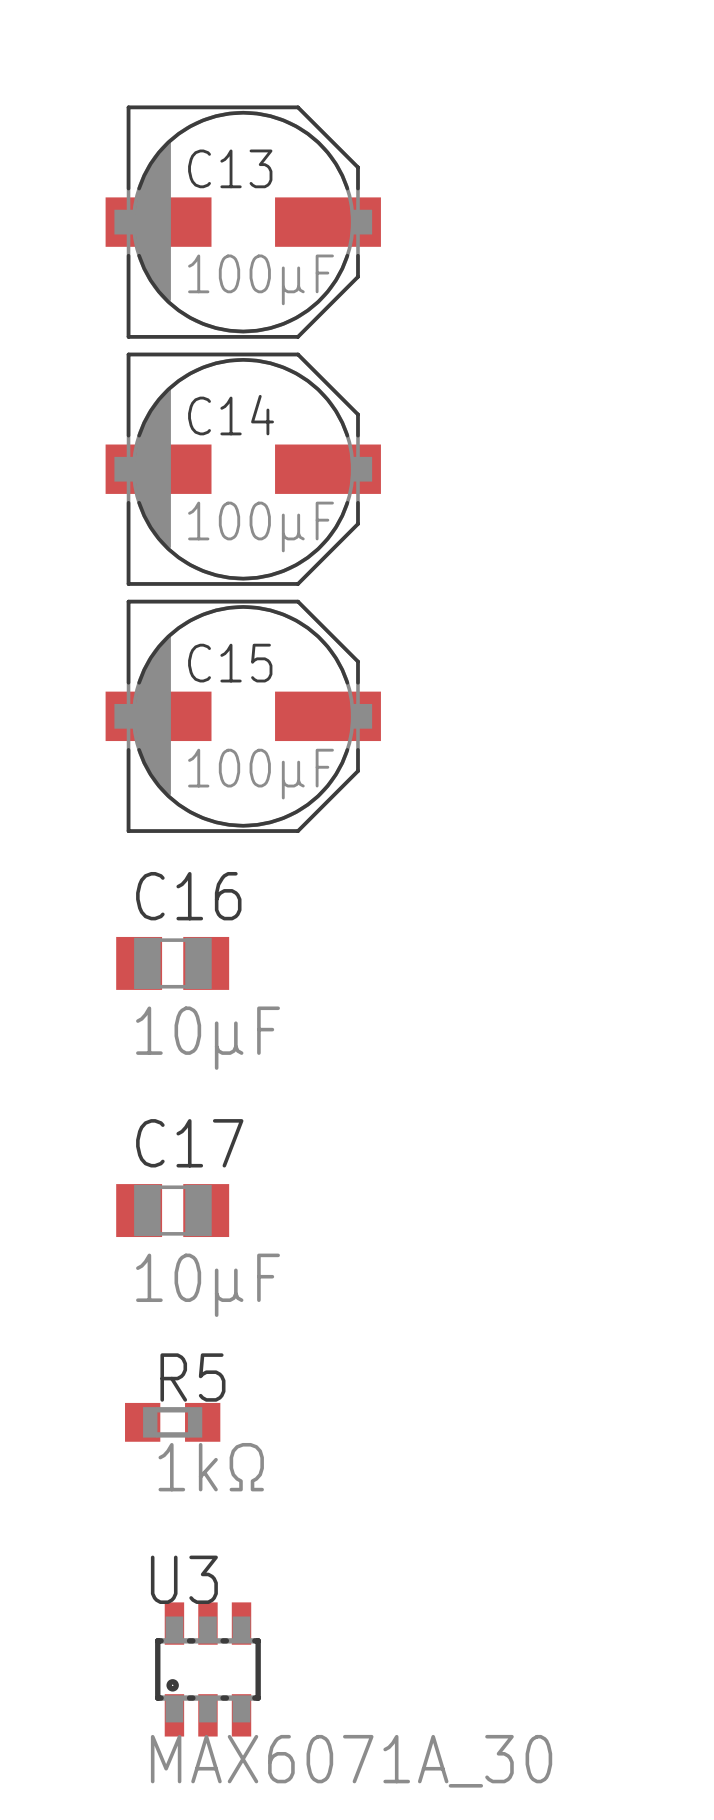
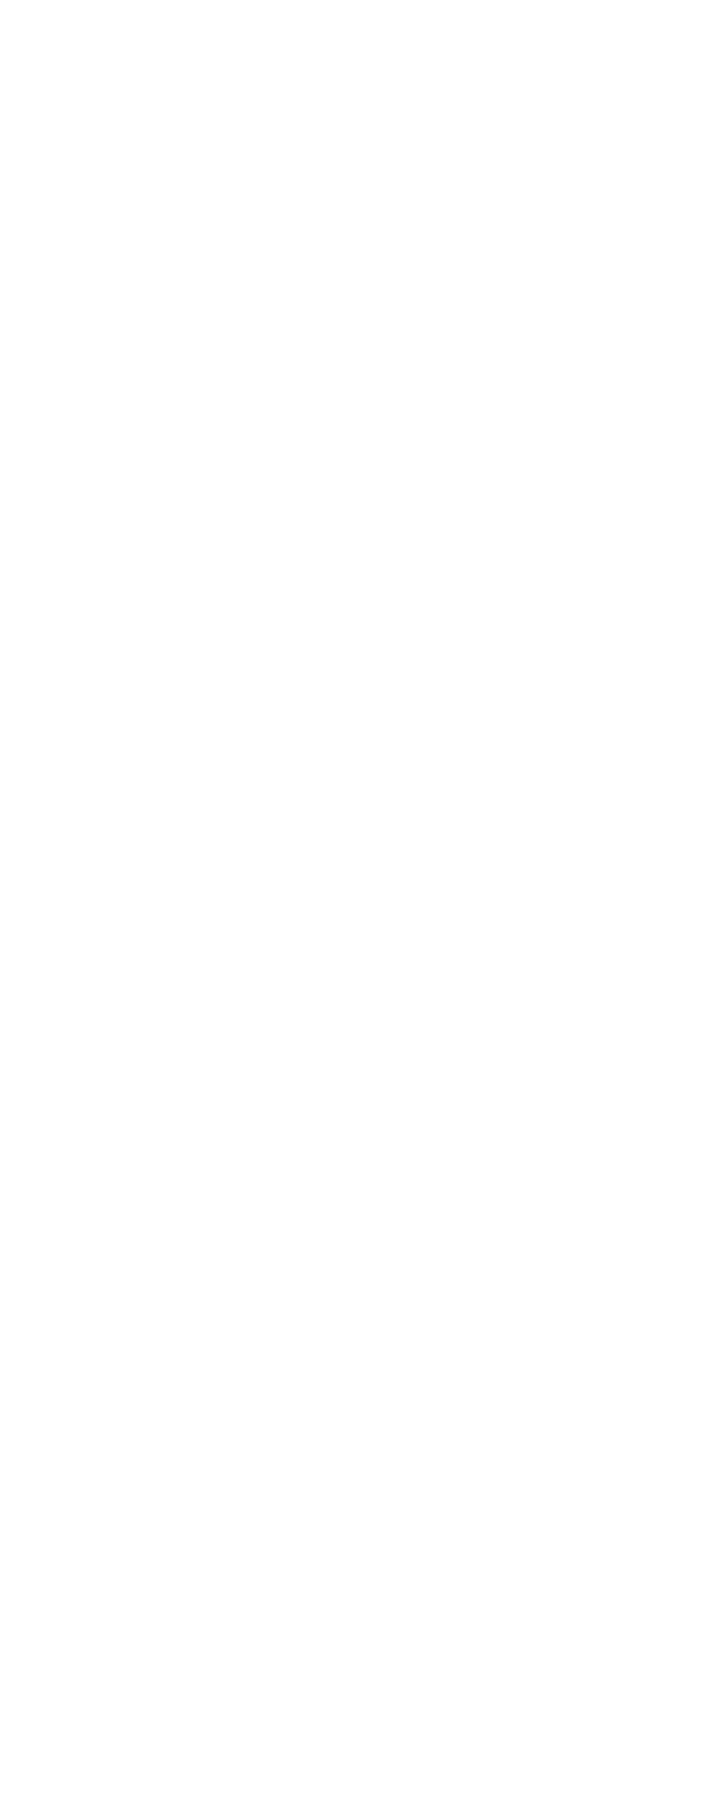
C13: 100µF (243, 222) -> none
C14: 100µF (243, 469) -> none
C15: 100µF (243, 716) -> none
C16: 10µF (172, 963) -> none
C17: 10µF (172, 1210) -> none
R5: 1kΩ (172, 1422) -> none
U3: MAX6071A_30 (207, 1669) -> none

